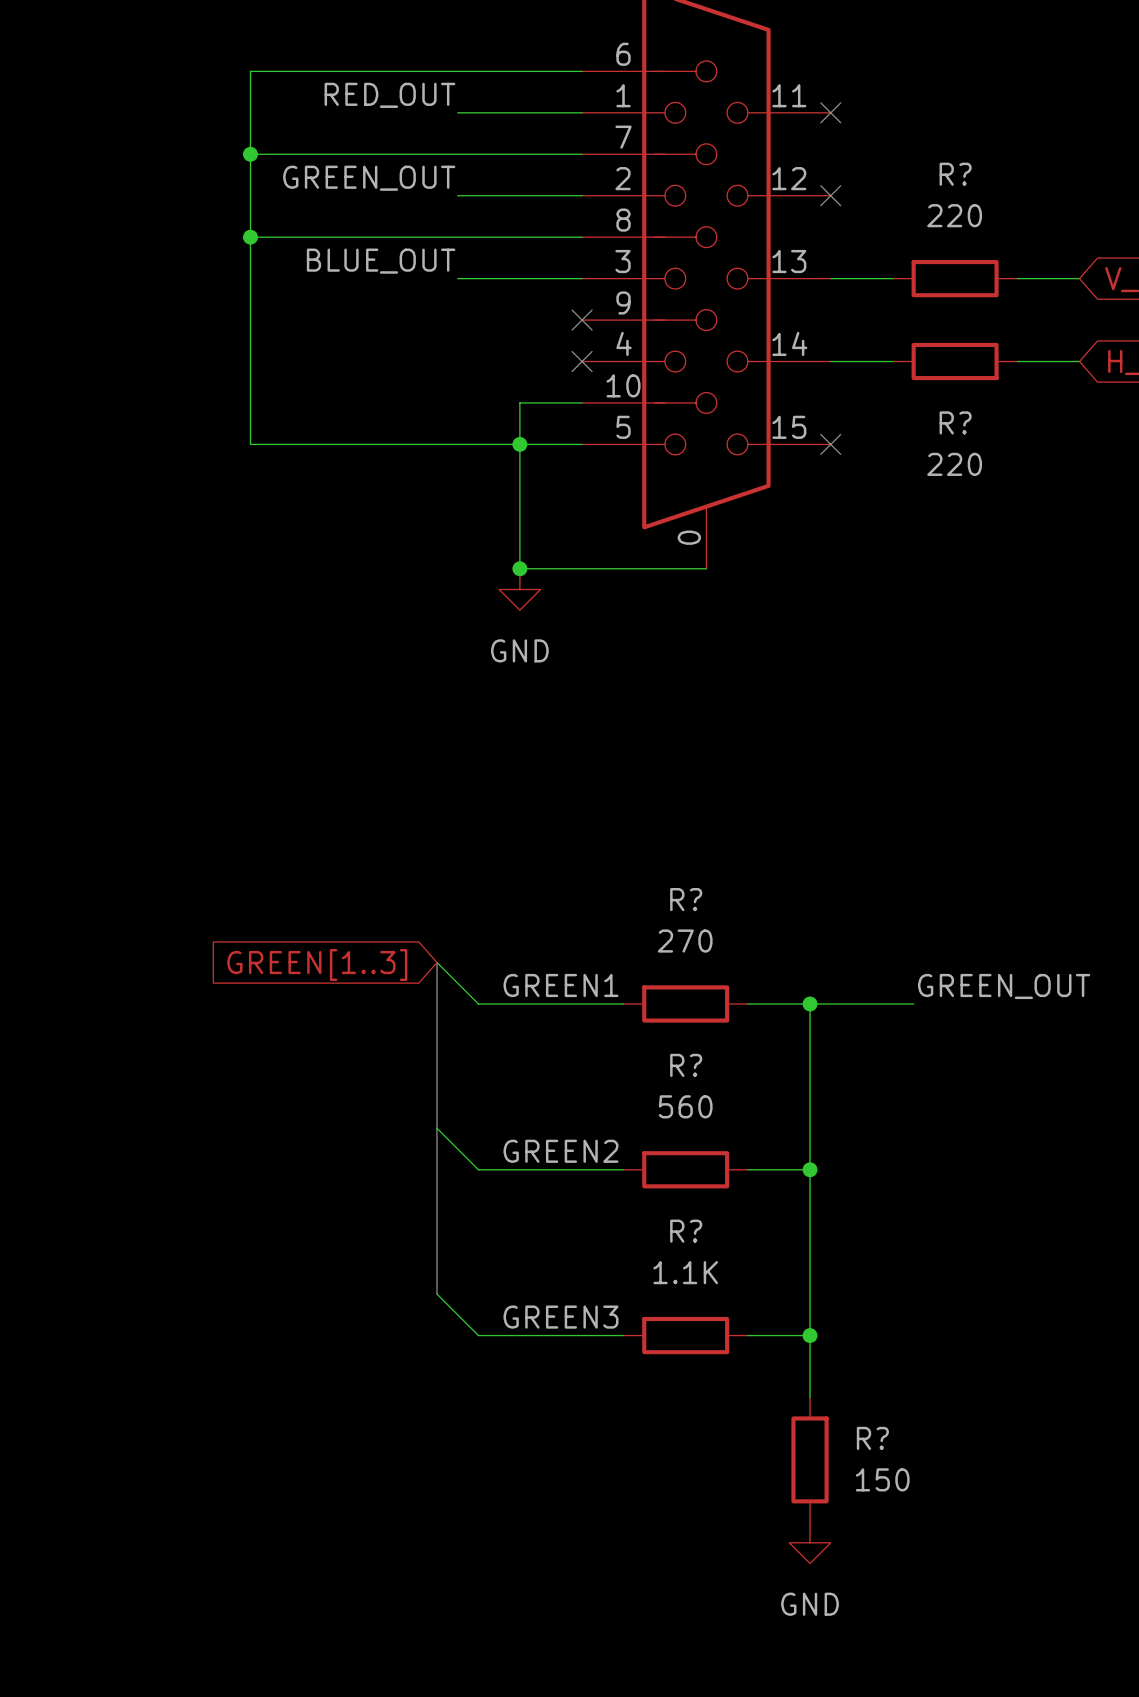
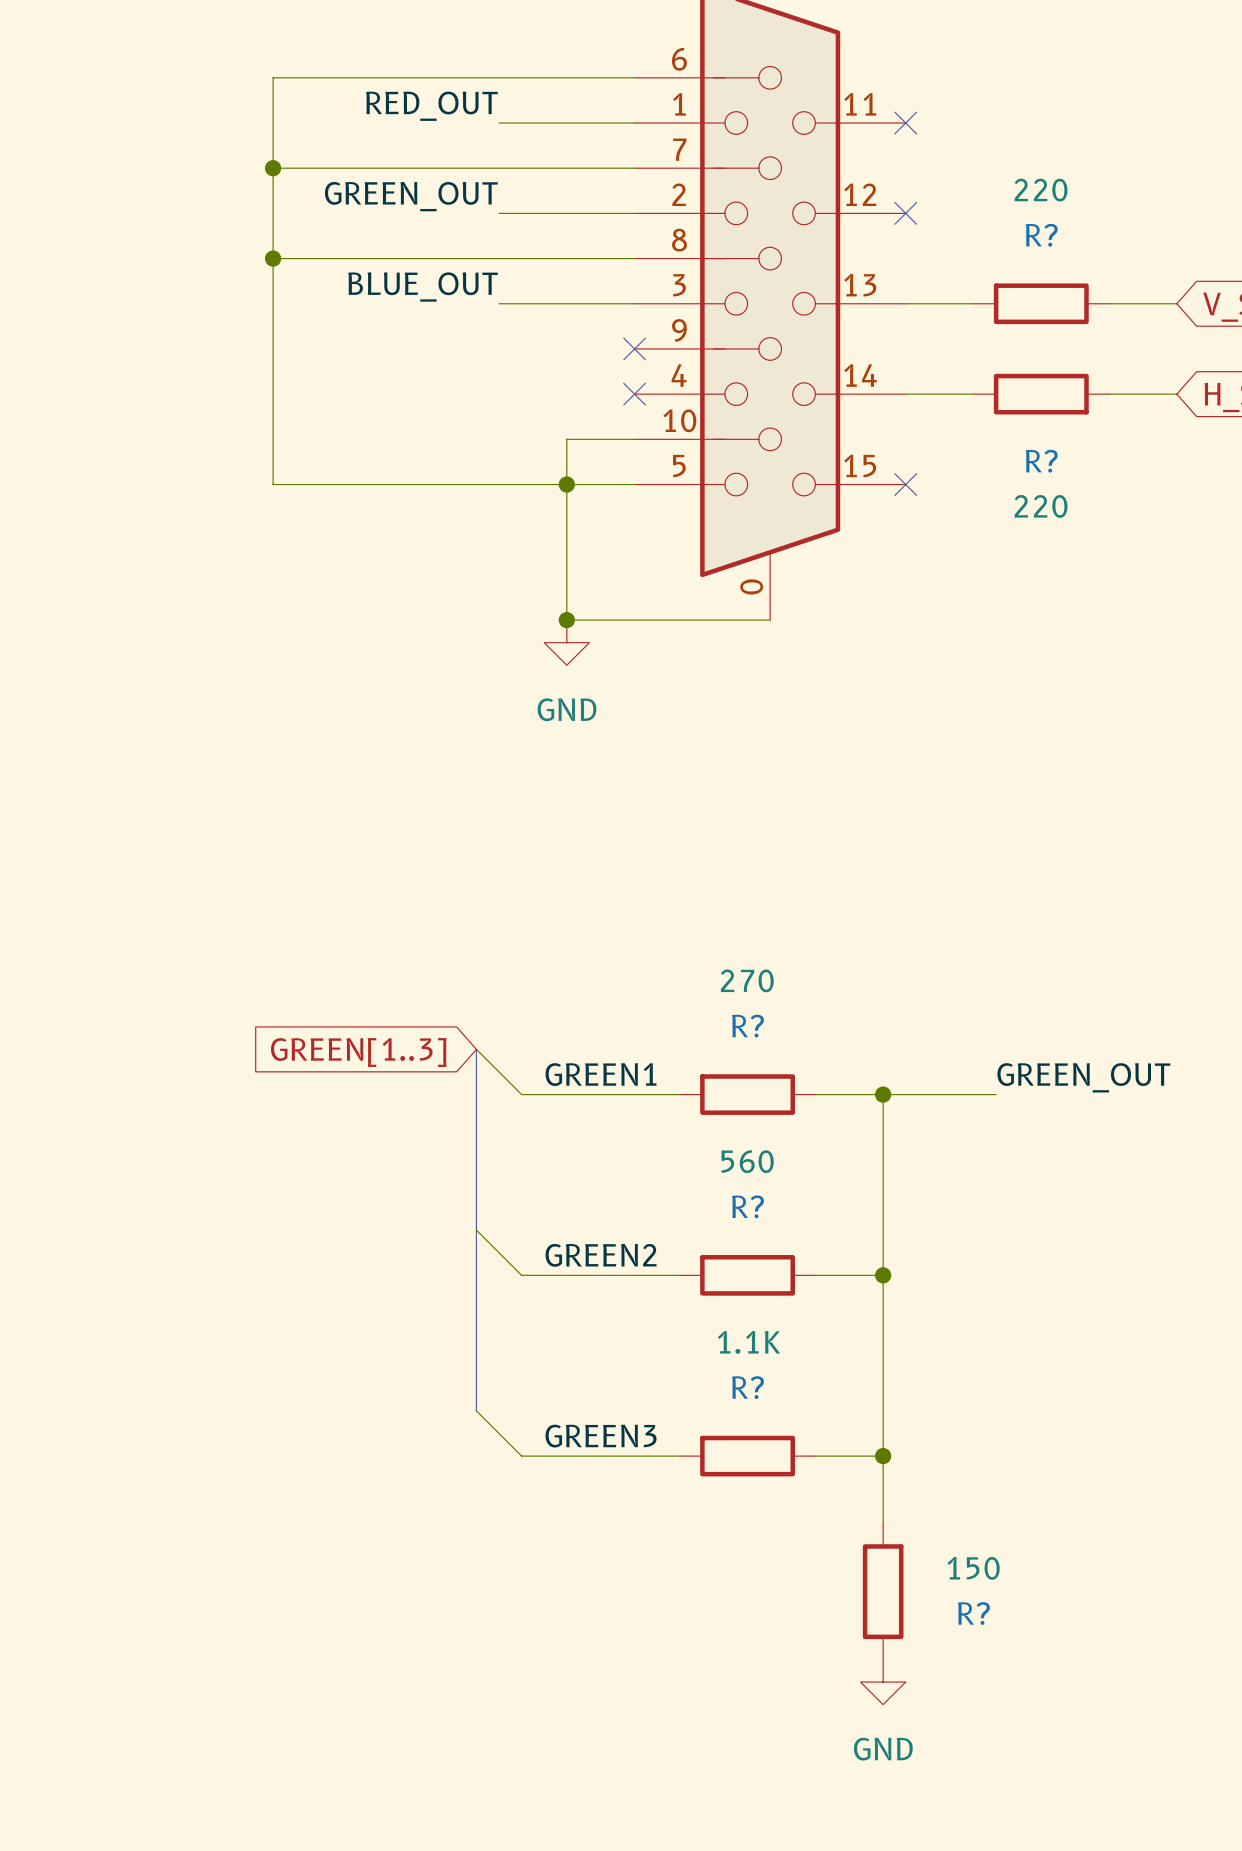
R? name position: R? (955, 174) -> R? (1041, 235)
R? value position: 220 (954, 215) -> 220 (1041, 190)
R? name position: R? (686, 899) -> R? (747, 1026)
R? value position: 270 (685, 941) -> 270 (747, 980)
R? name position: R? (686, 1065) -> R? (747, 1206)
R? value position: 560 (685, 1106) -> 560 (747, 1161)
R? name position: R? (686, 1231) -> R? (747, 1387)
R? value position: 1.1K (685, 1272) -> 1.1K (748, 1342)
R? name position: R? (872, 1438) -> R? (973, 1613)
R? value position: 150 (882, 1479) -> 150 (973, 1568)

